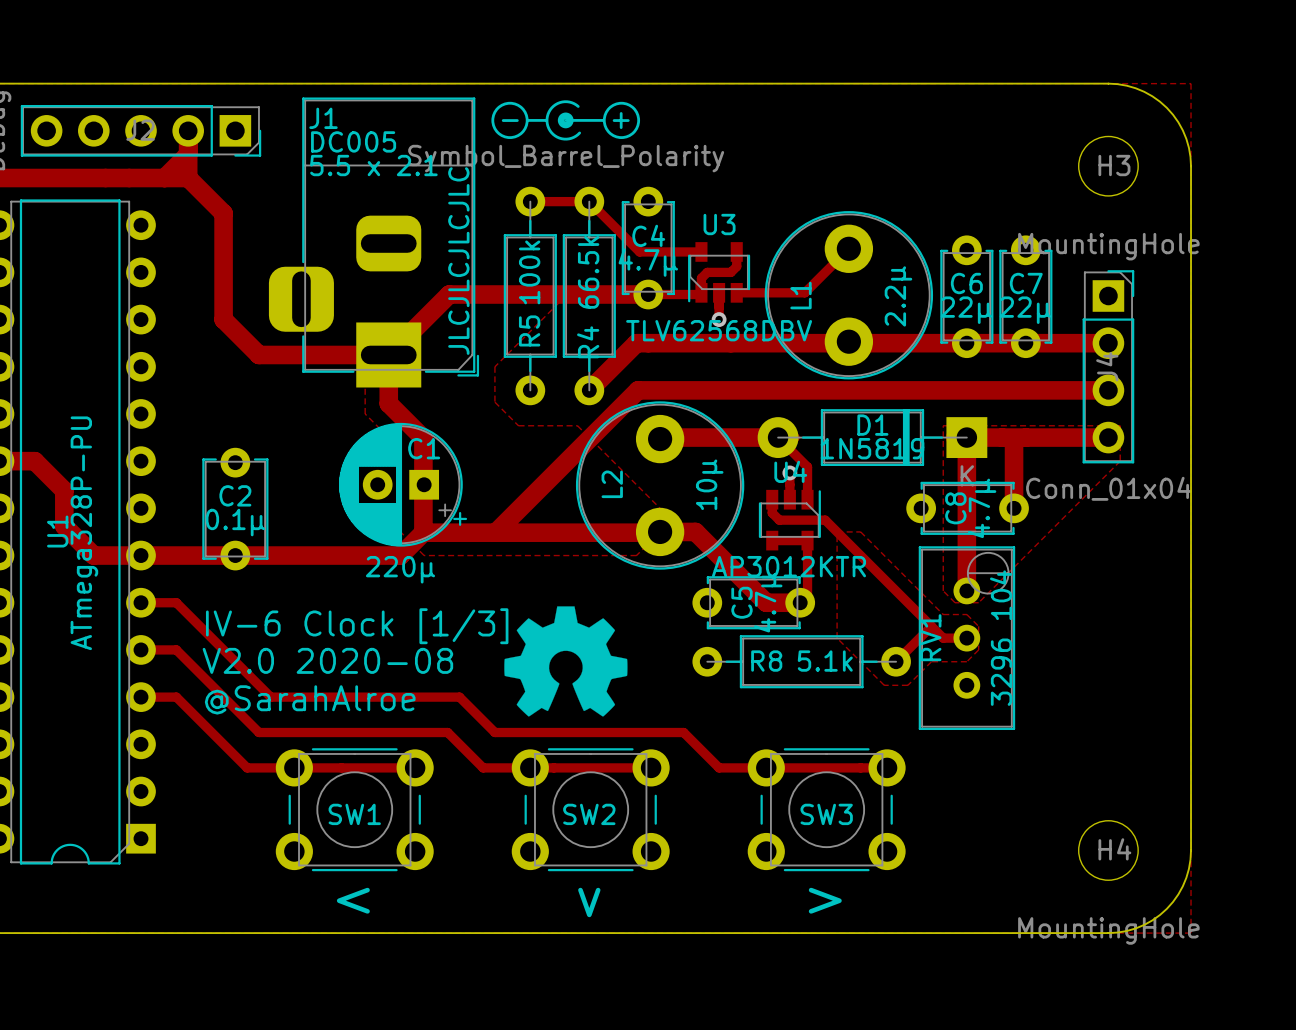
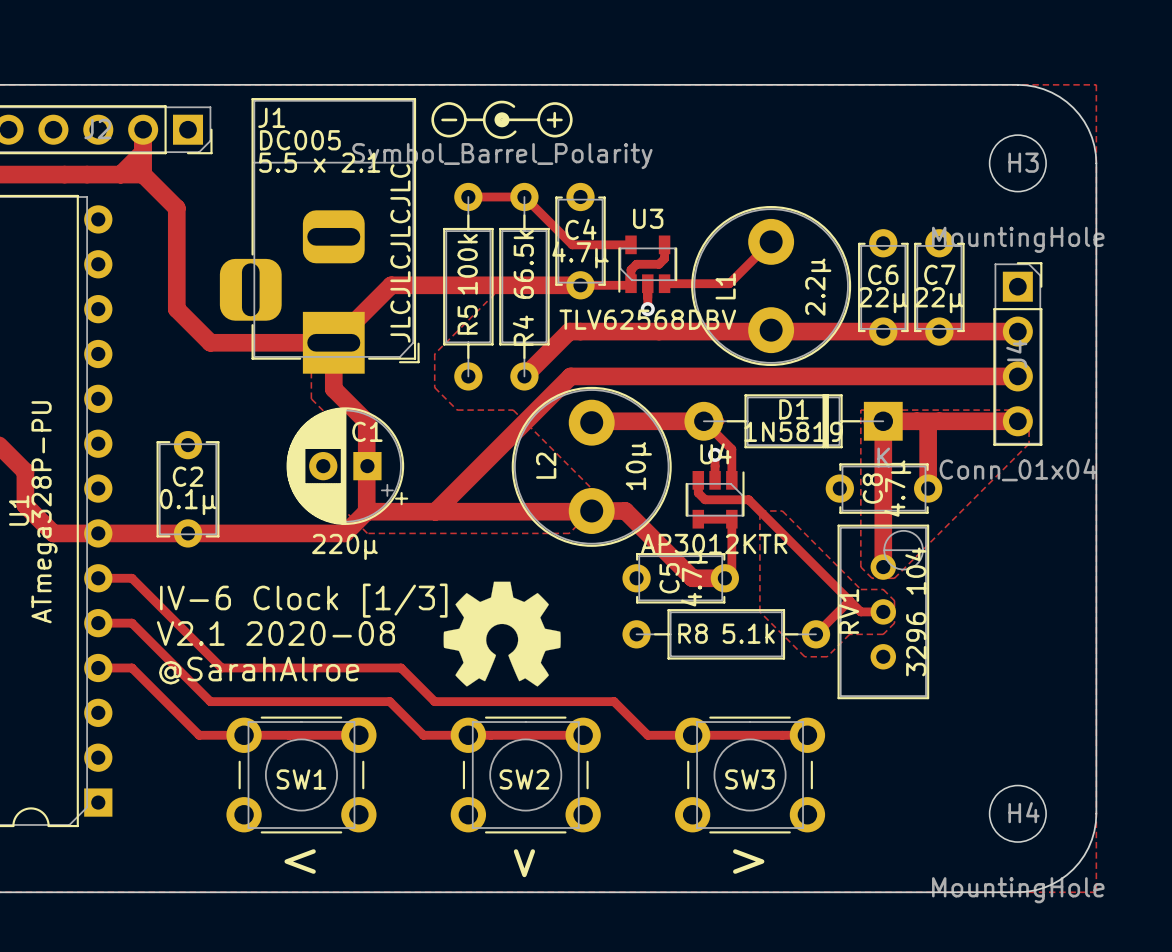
text: V2.0 2020-08 (327, 660) -> V2.1 2020-08 (275, 633)

